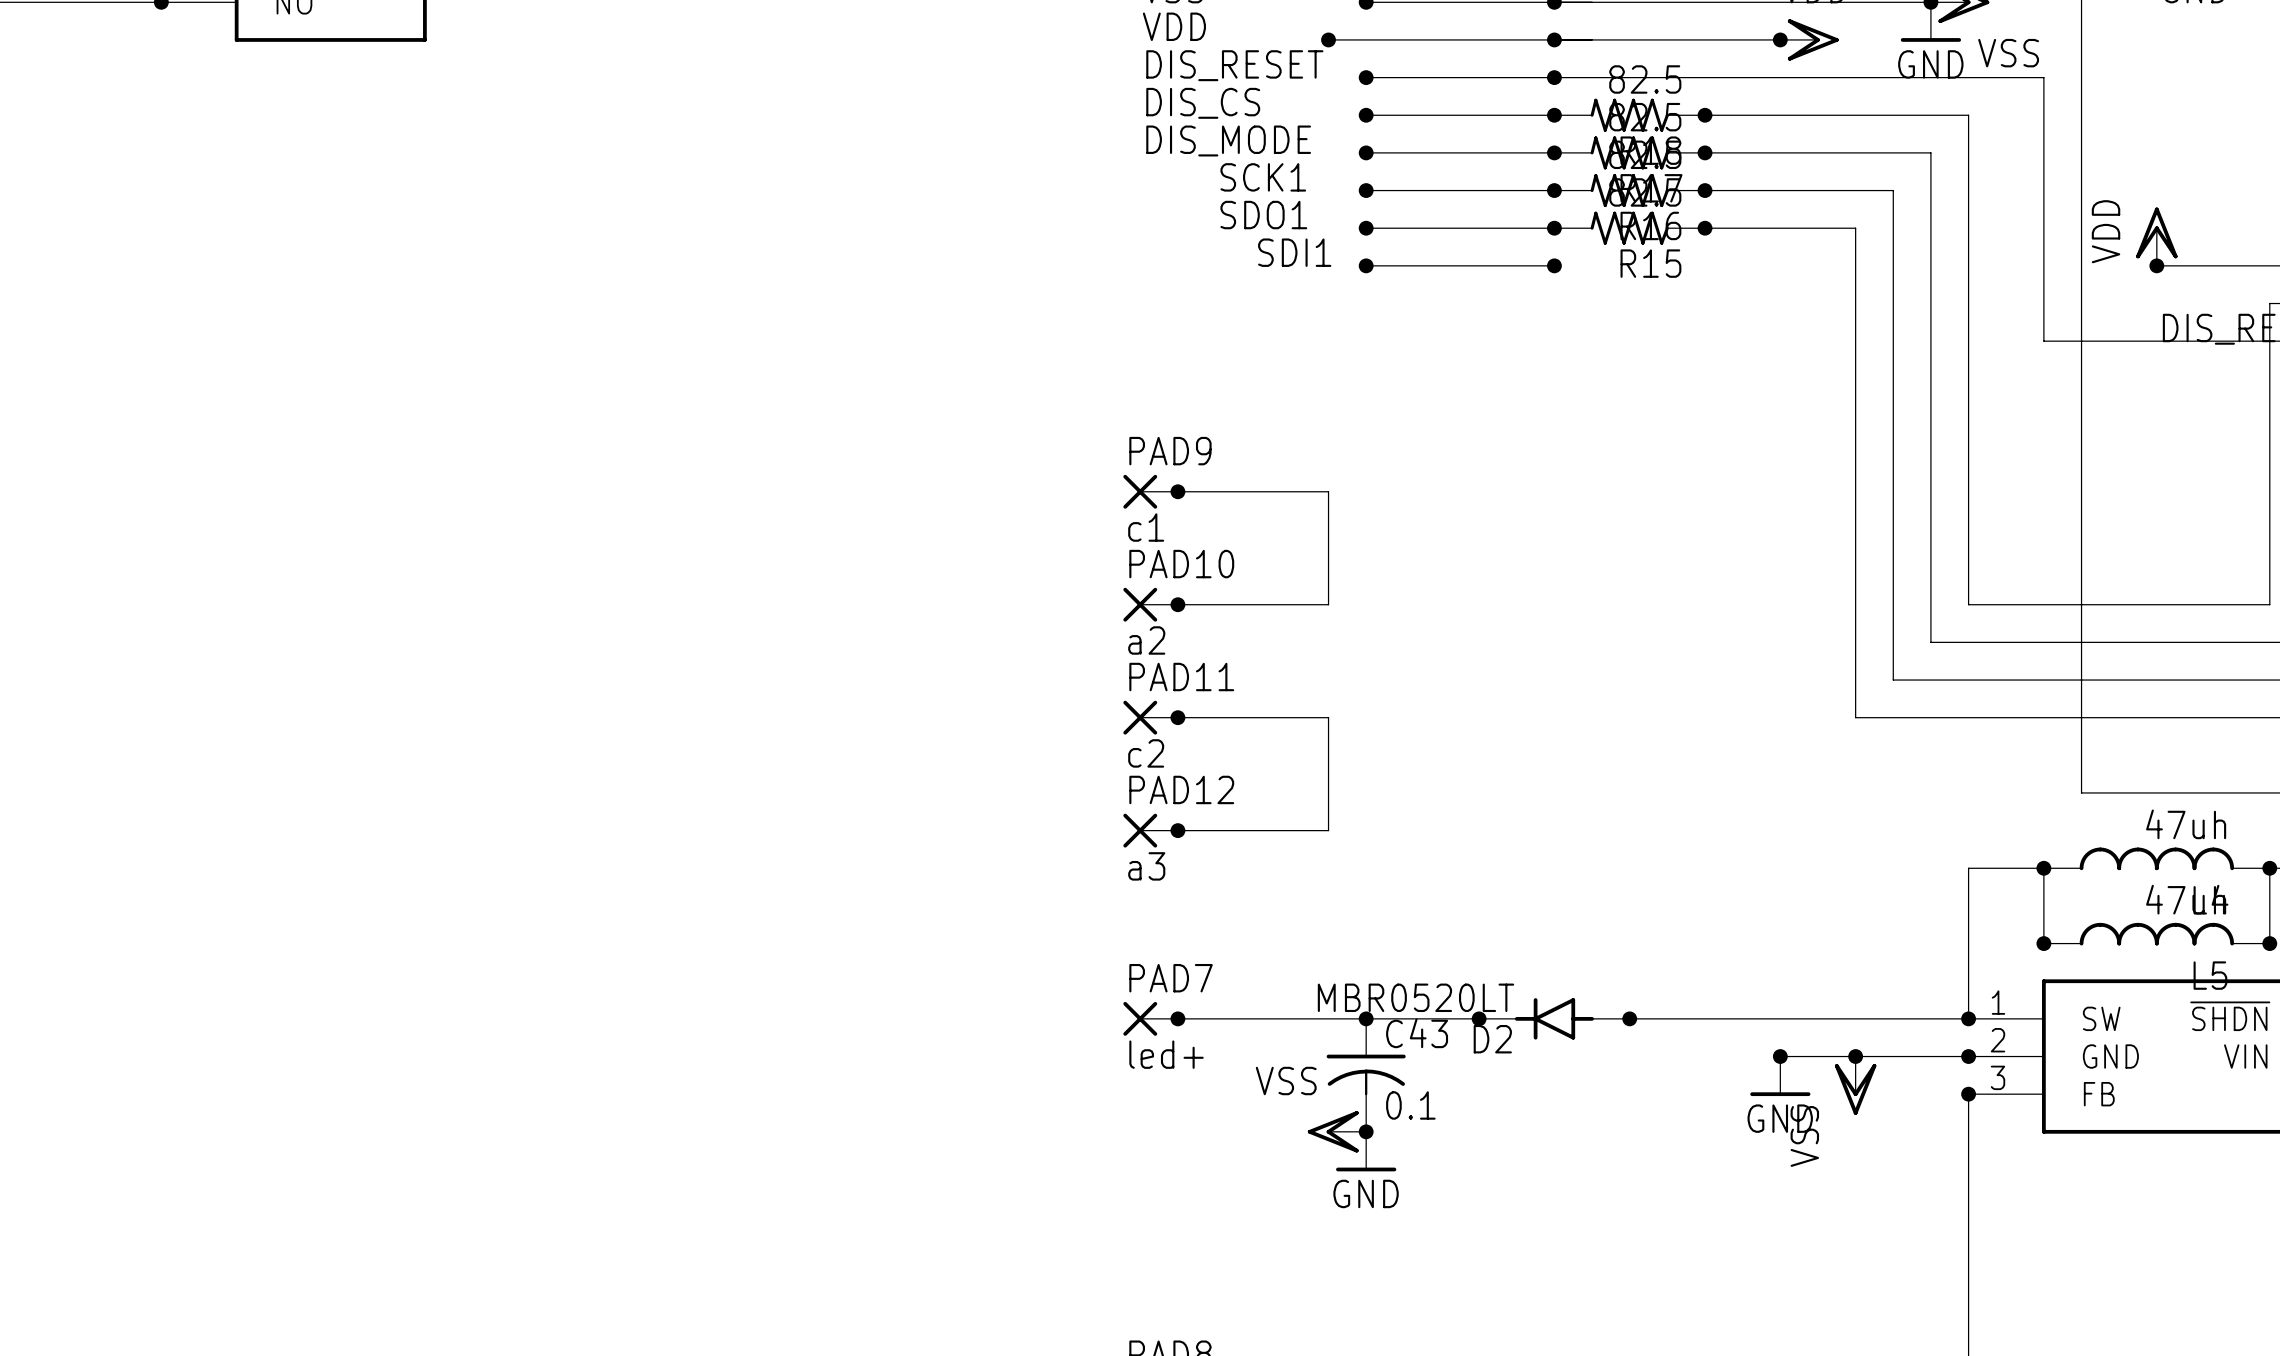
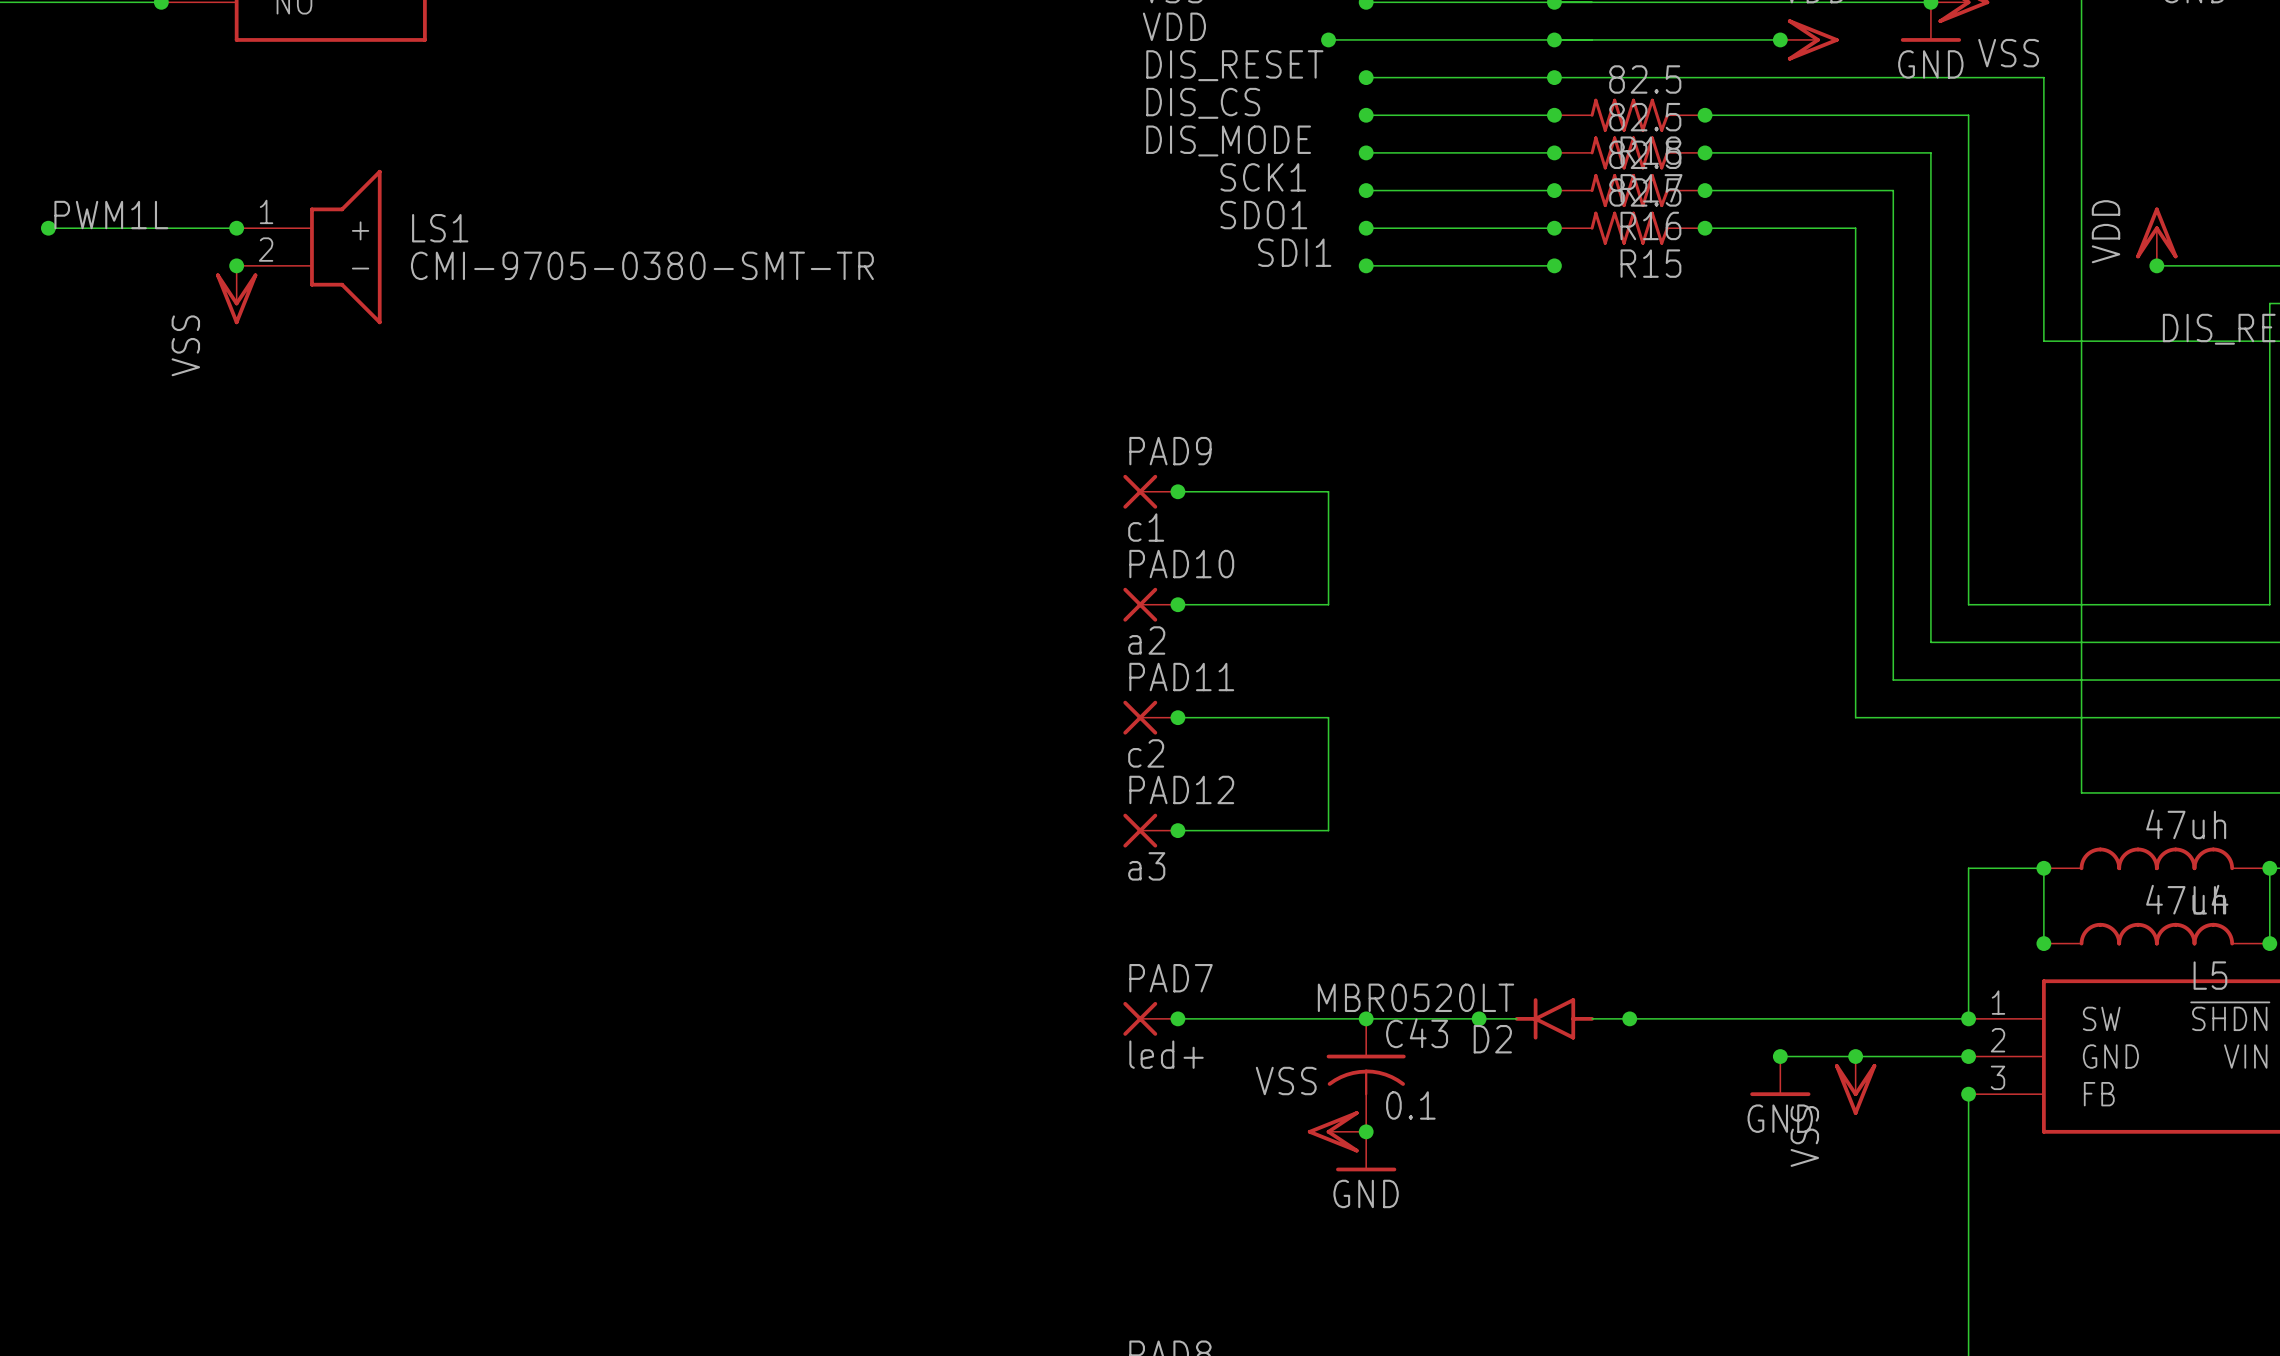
label: none -> PWM1L (111, 215)
wire: none -> (48, 228) (236, 228)
junction: none -> (48, 228)
junction: none -> (236, 228)
LS1: none -> CMI-9705-0380-SMT-TR (309, 247)
junction: none -> (236, 265)
power symbol: none -> VSS (236, 295)

